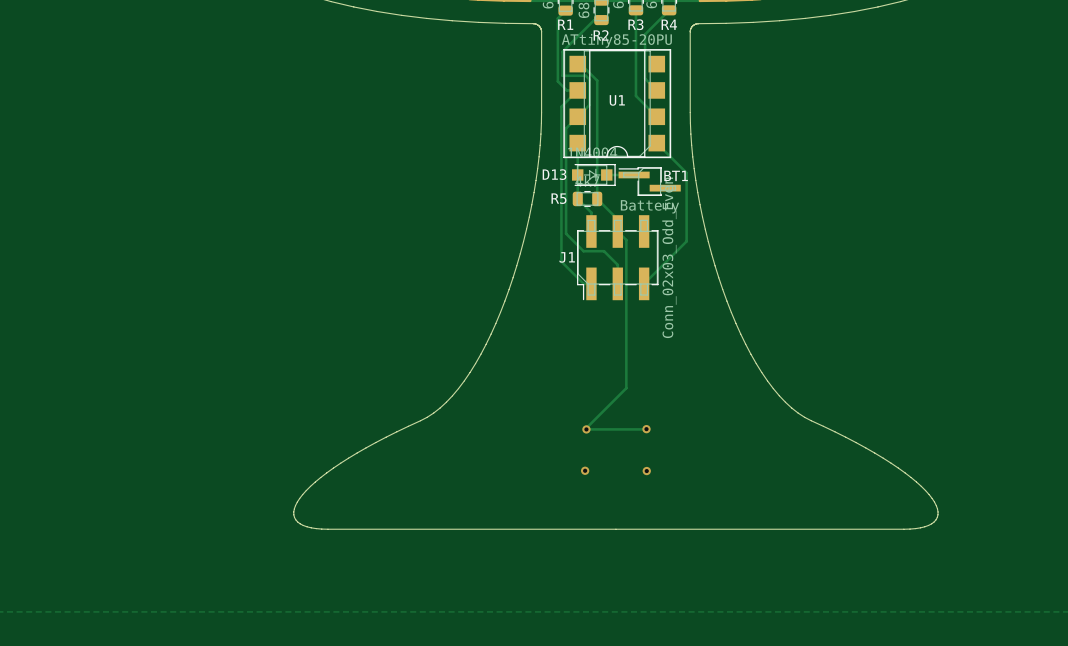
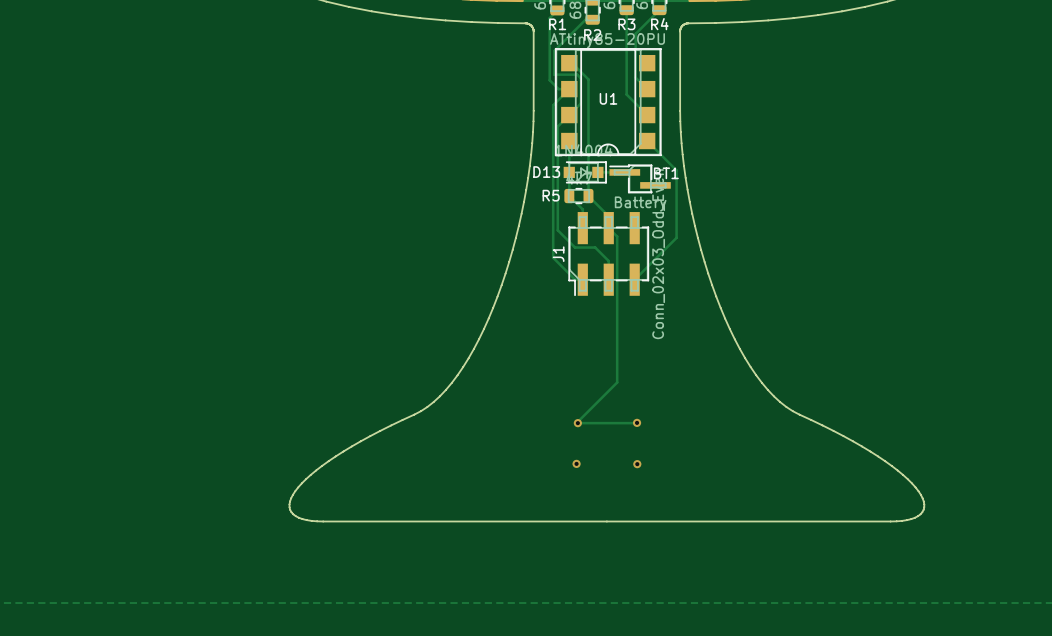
J1 name rotation: 0° (567, 257) -> 90° counterclockwise (558, 254)

